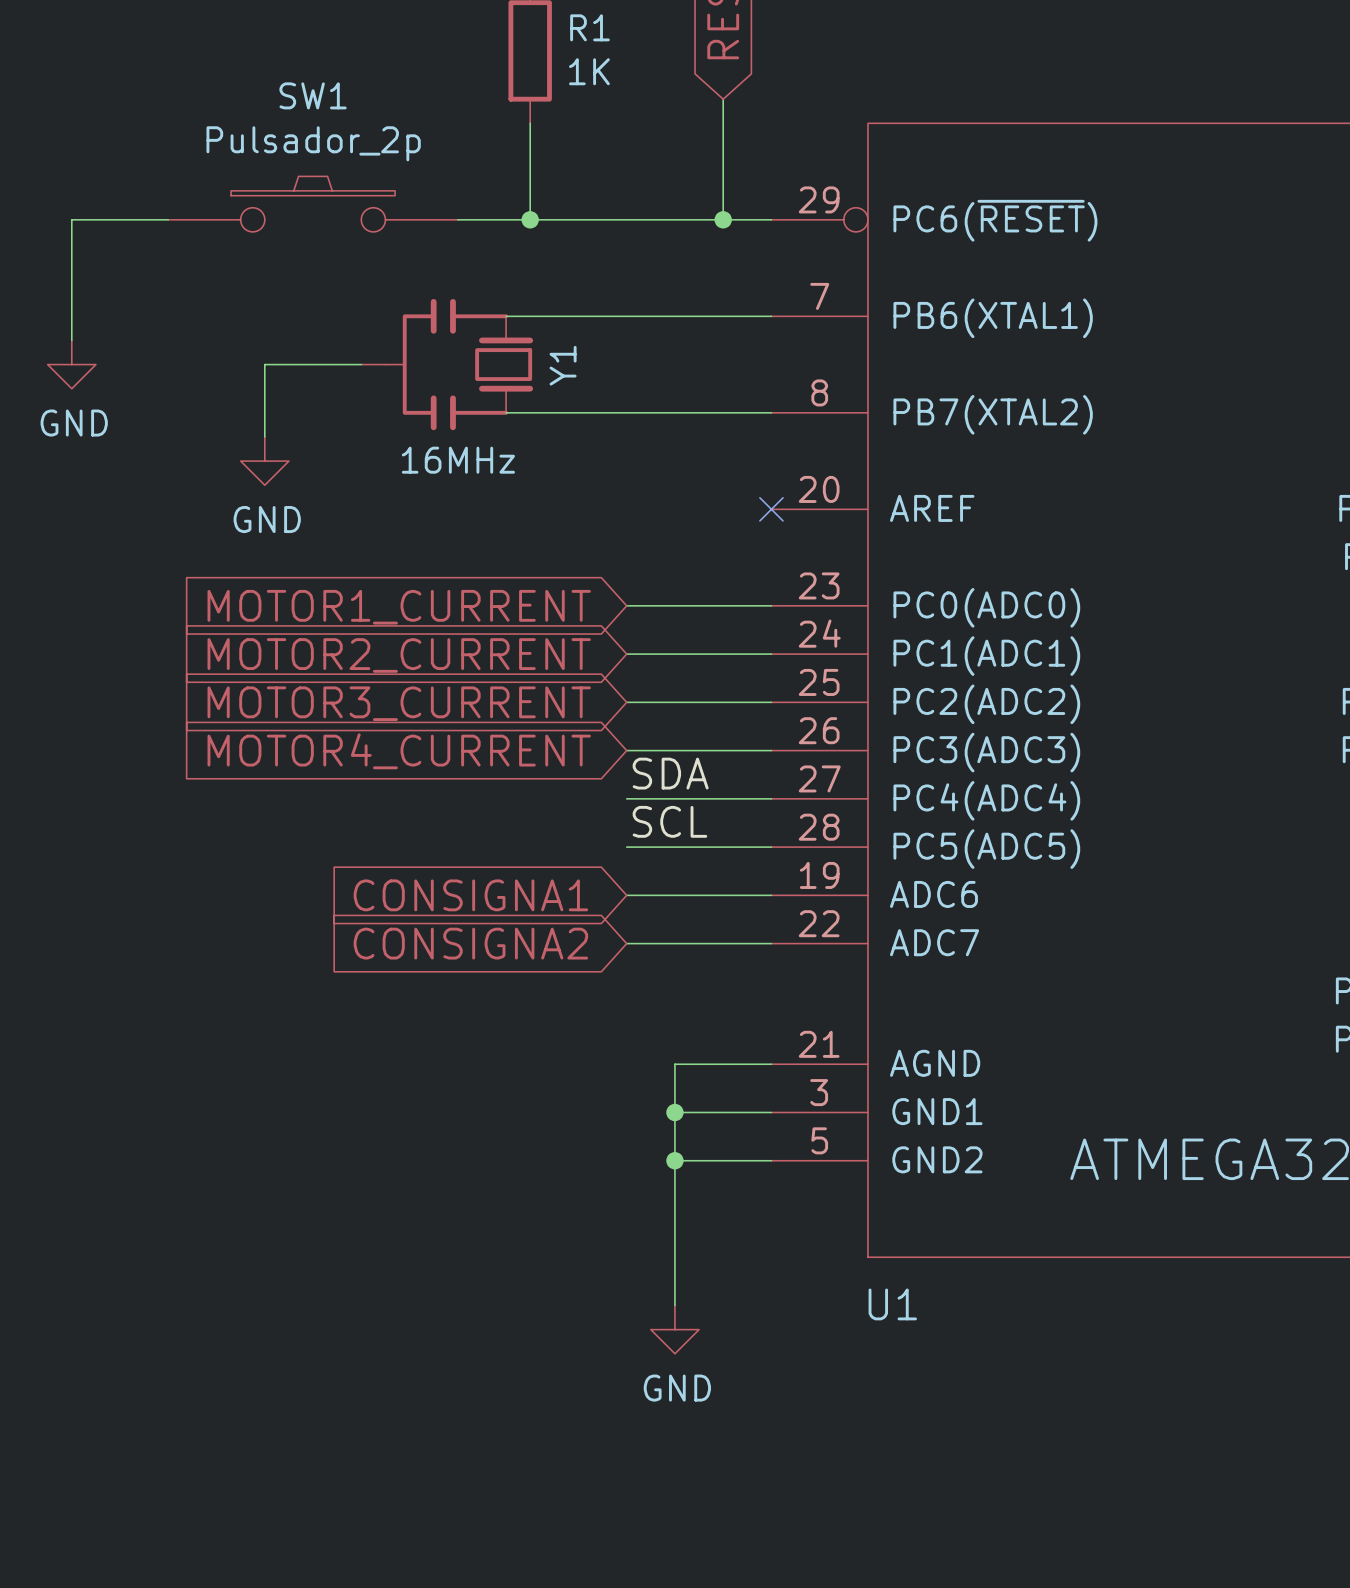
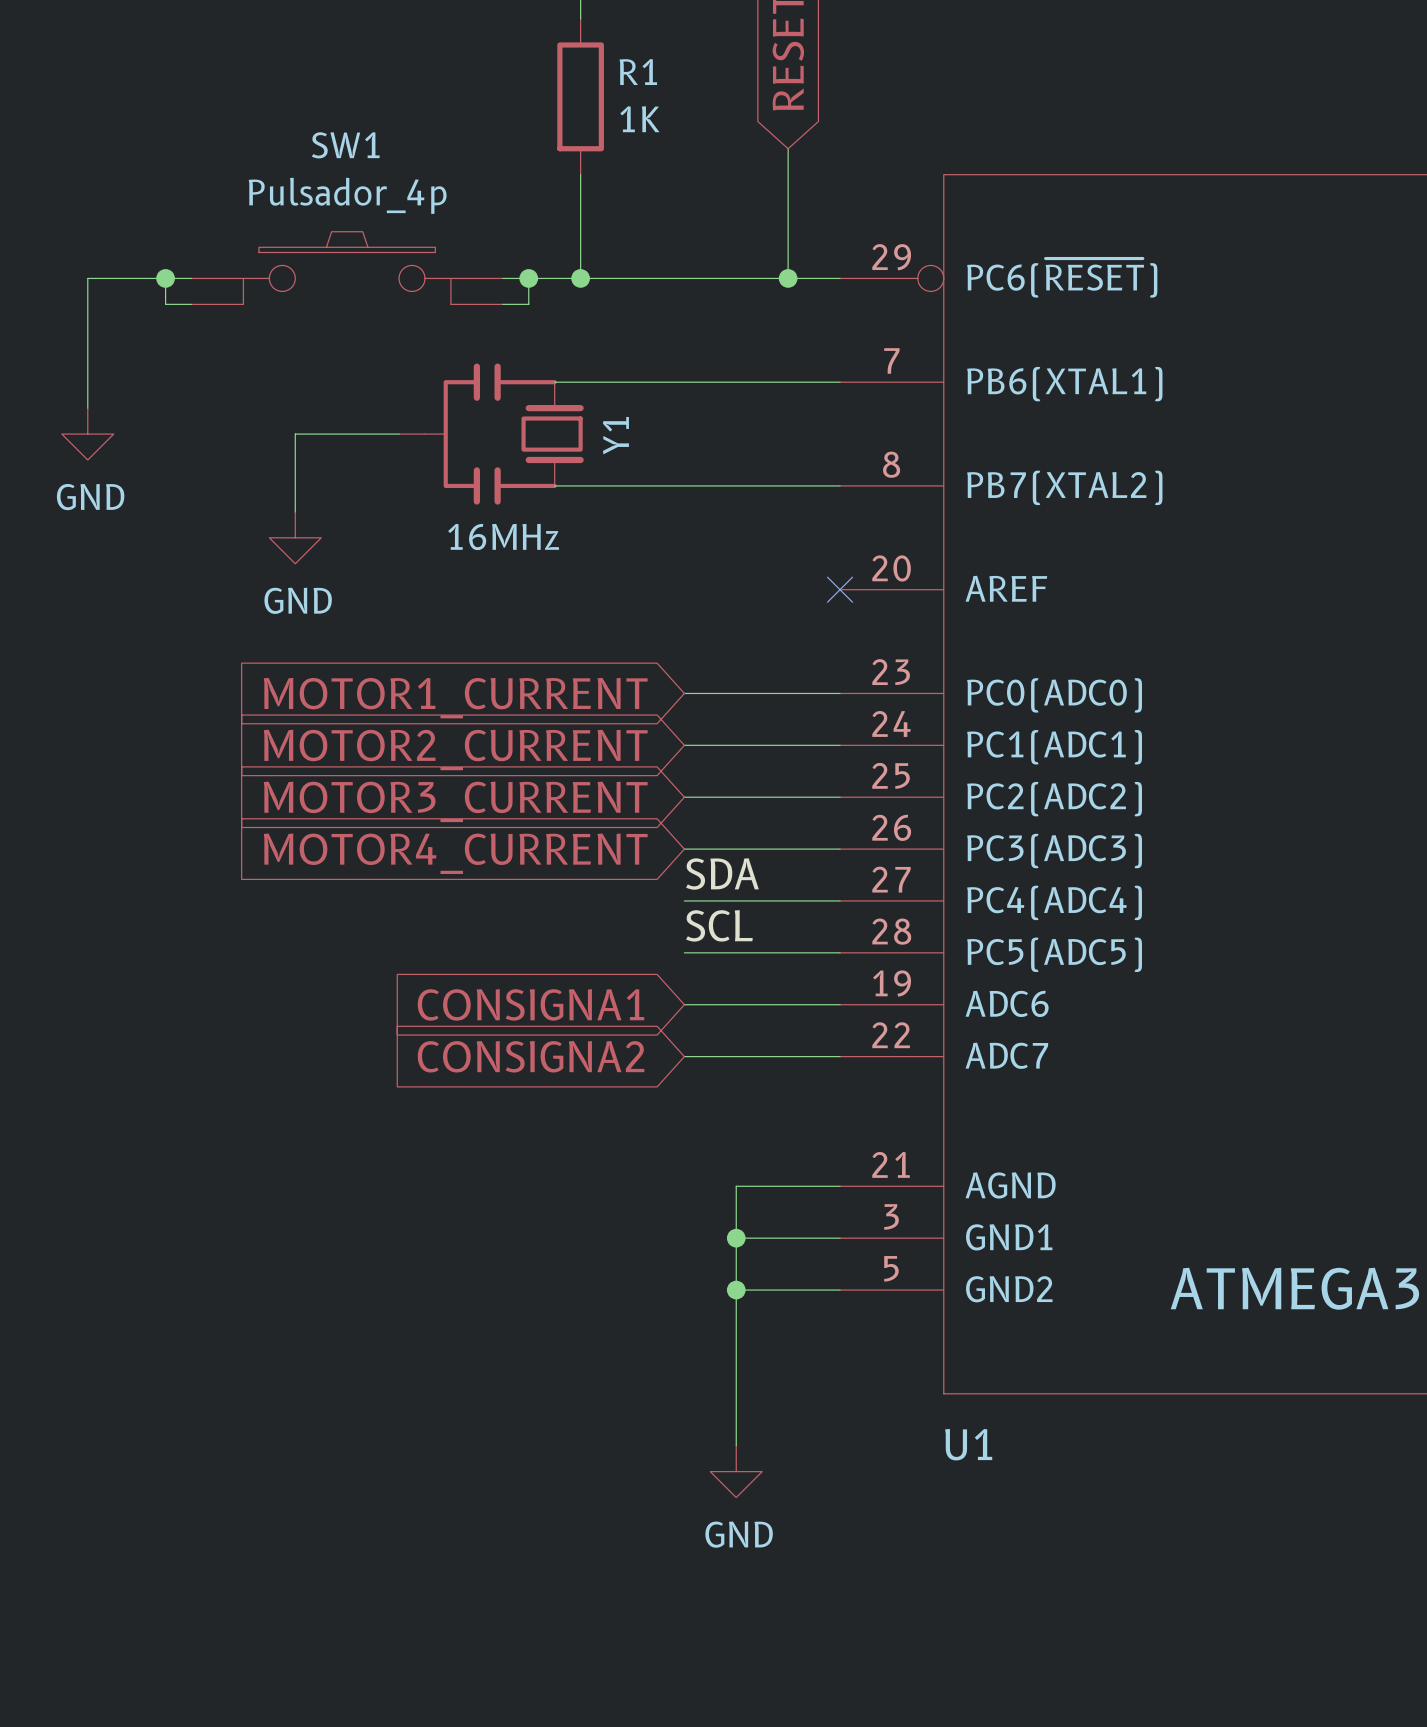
SW1 value: Pulsador_2p (313, 143) -> Pulsador_4p (347, 195)
SW1 symbol: [168, 176, 458, 232] -> [191, 231, 503, 305]
wire: none -> (165, 278) (165, 304) (191, 304)
junction: none -> (165, 278)
wire: none -> (528, 278) (528, 304) (502, 304)
junction: none -> (528, 278)

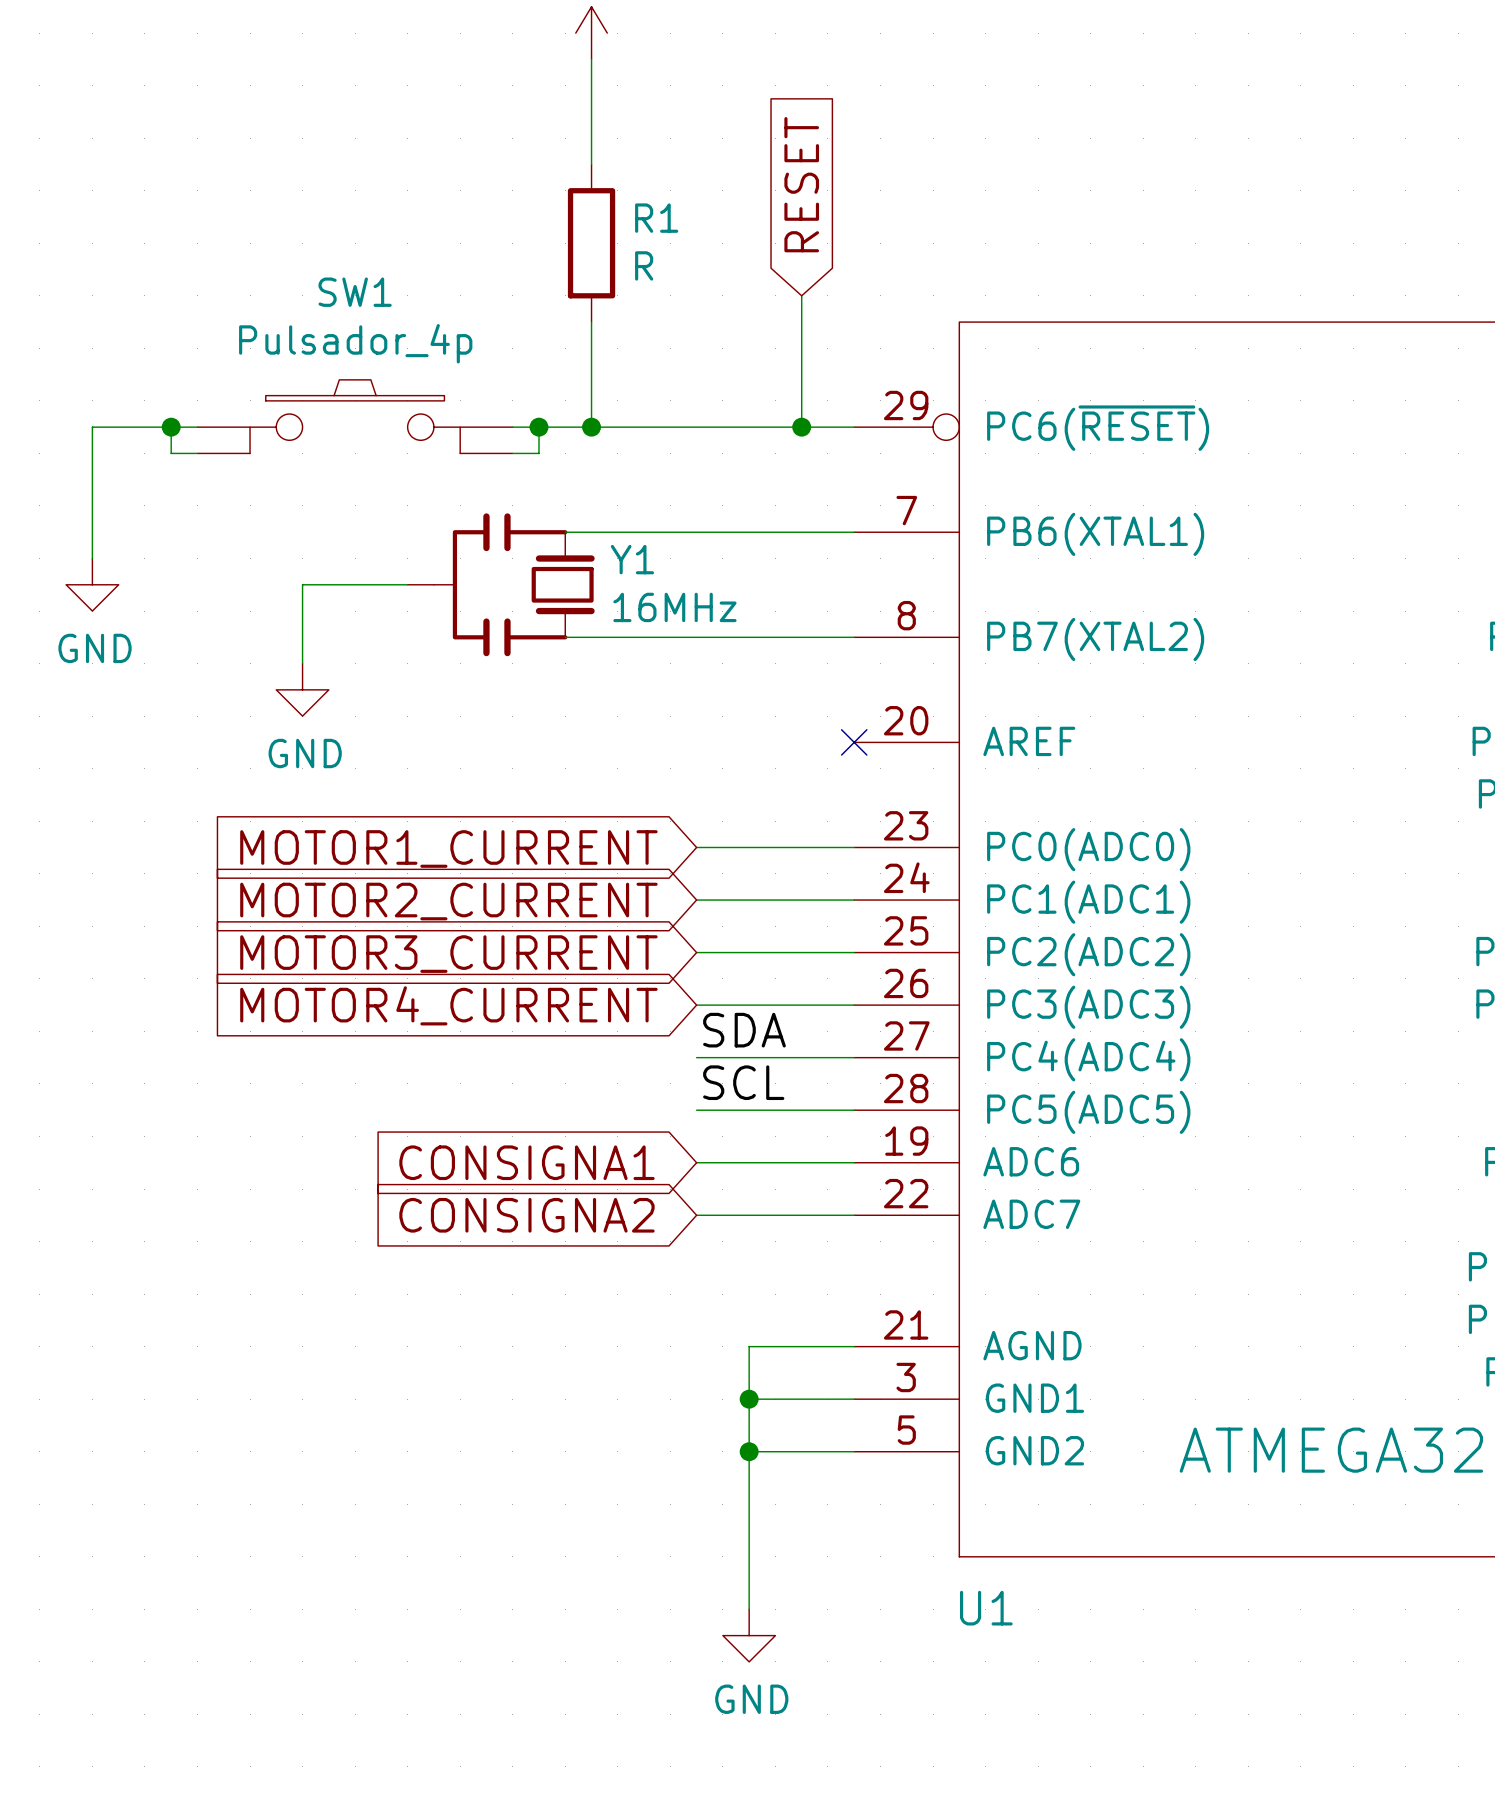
R1 value: 1K (639, 119) -> R (644, 265)
Y1 name rotation: 0° (615, 435) -> 90° clockwise (632, 559)
Y1 value position: 16MHz (503, 537) -> 16MHz (674, 607)

